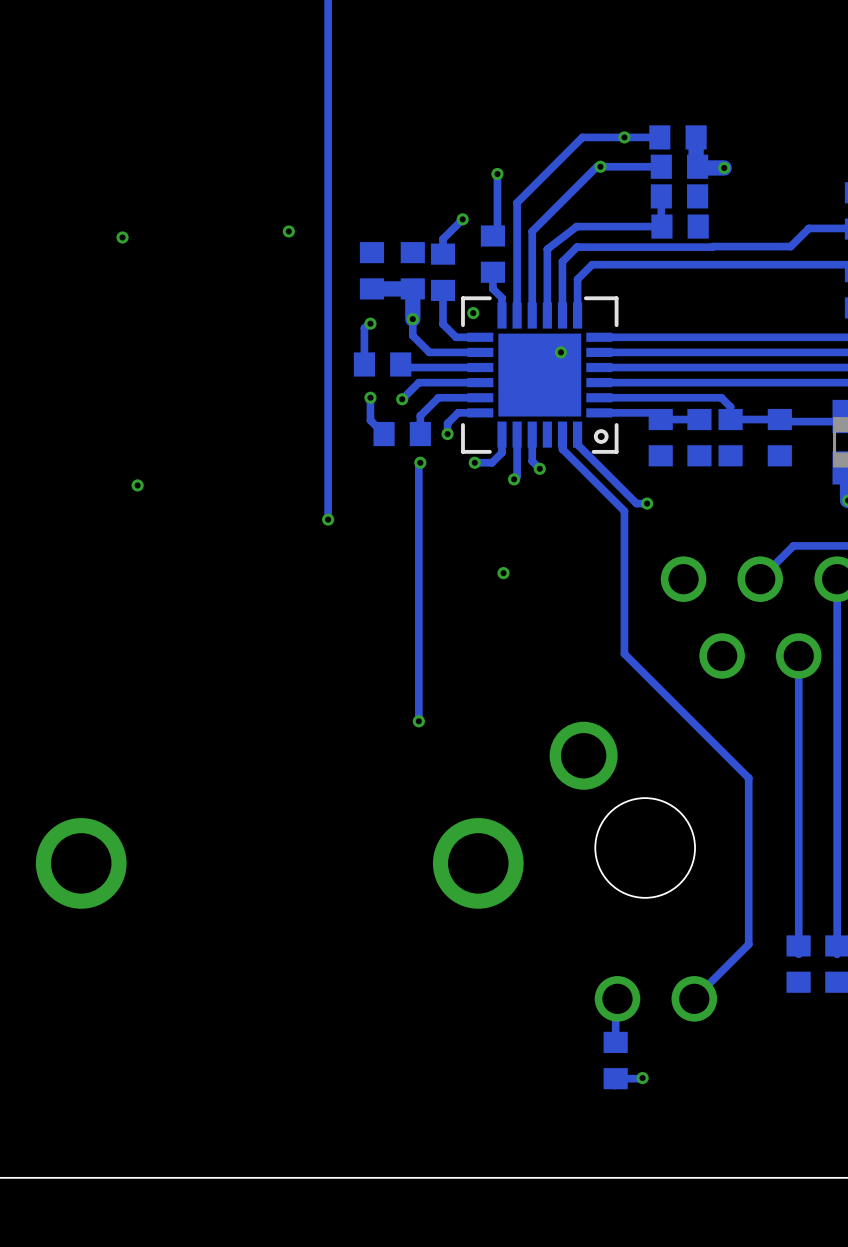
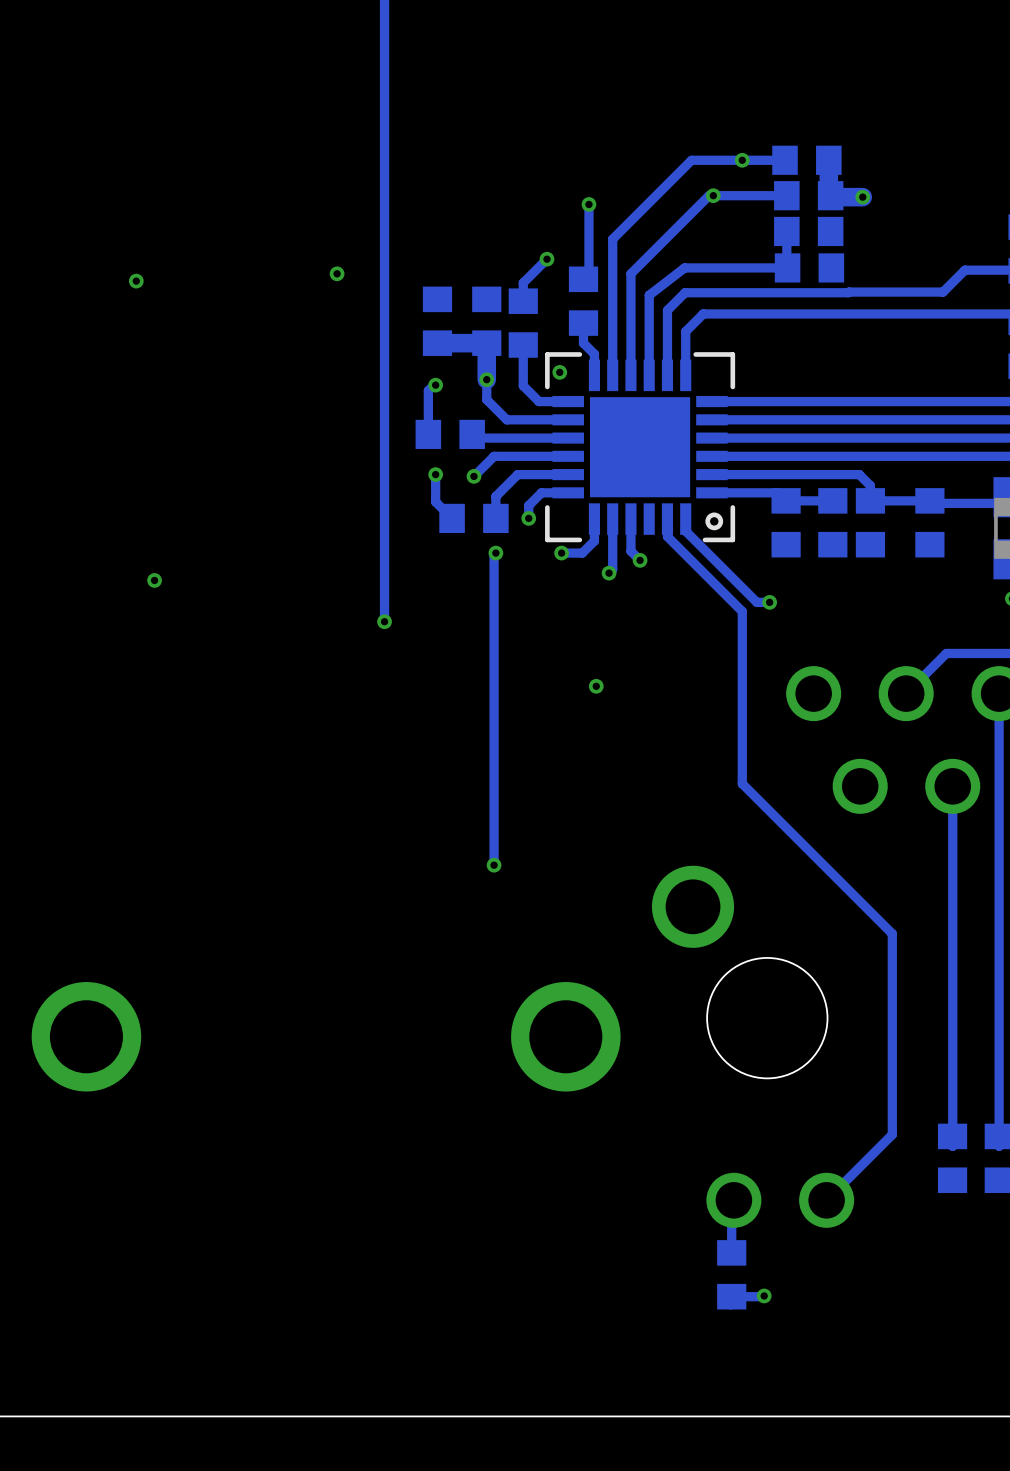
via: (560, 352) -> none

